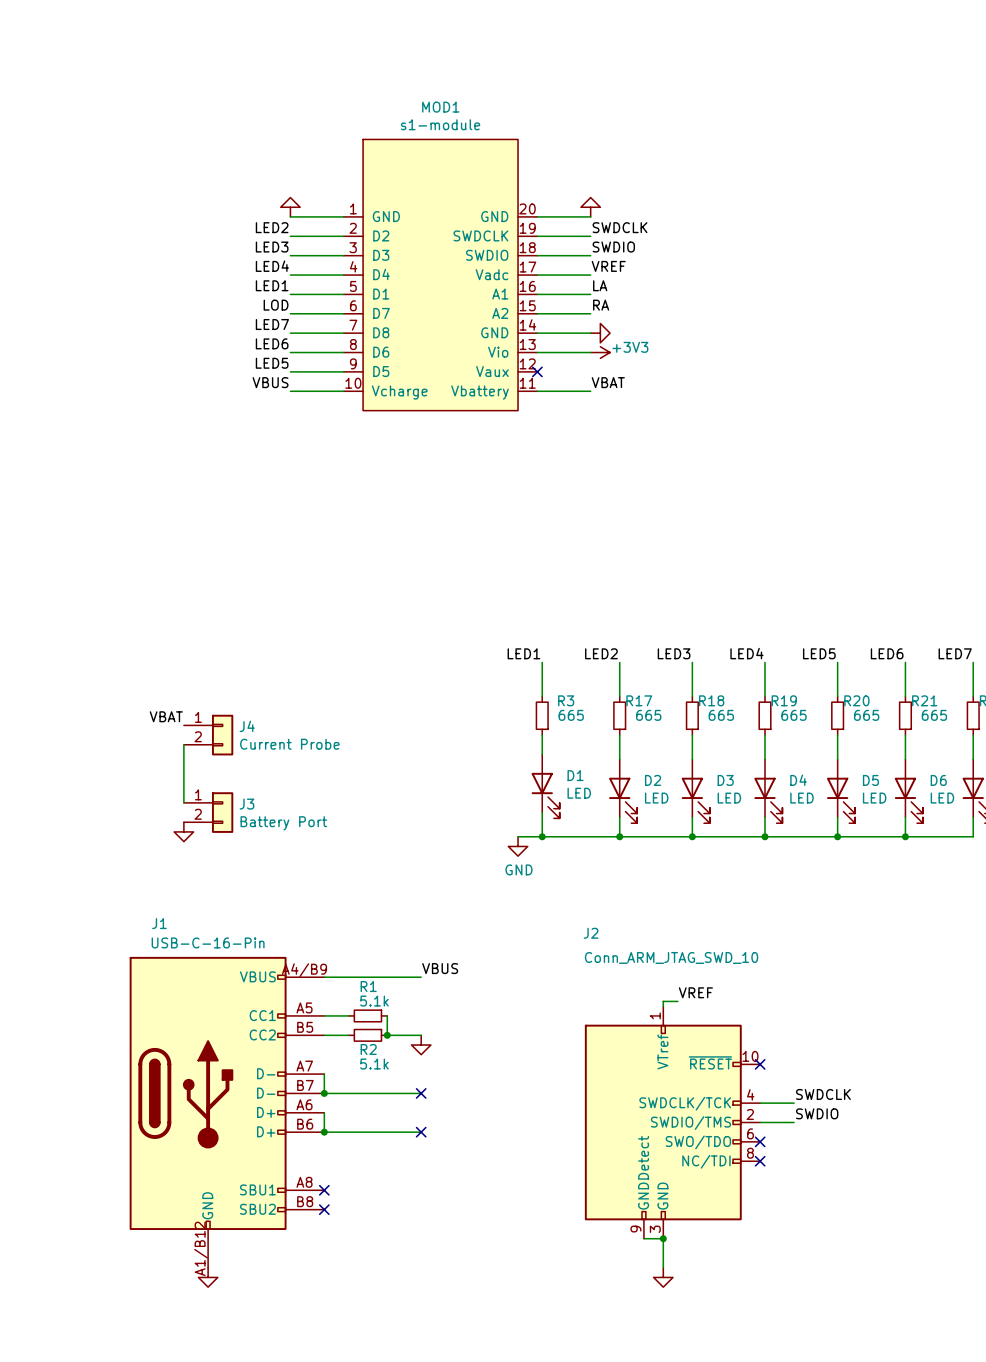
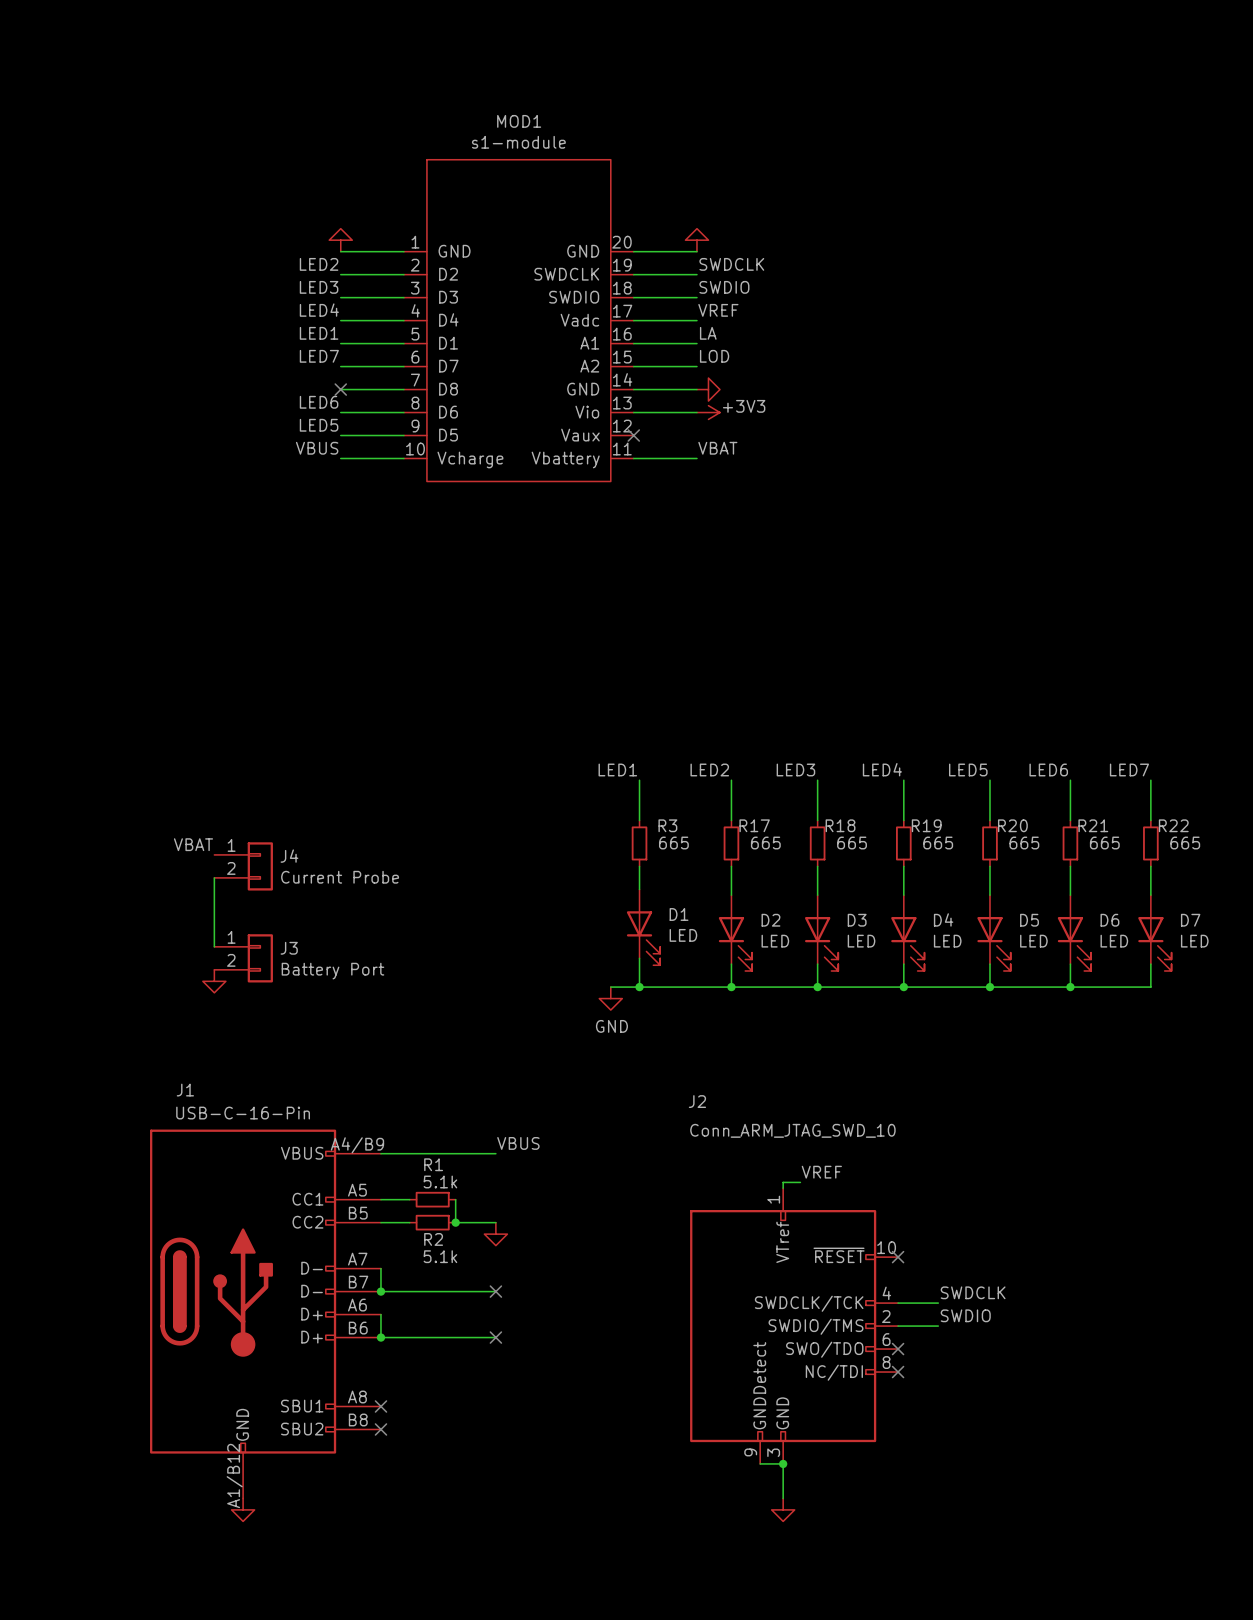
label: LOD (276, 305) -> LED7 (319, 356)
label: RA (601, 305) -> LOD (714, 356)
label: LED7 (272, 324) -> none
no-connect mark: none -> (340, 389)

